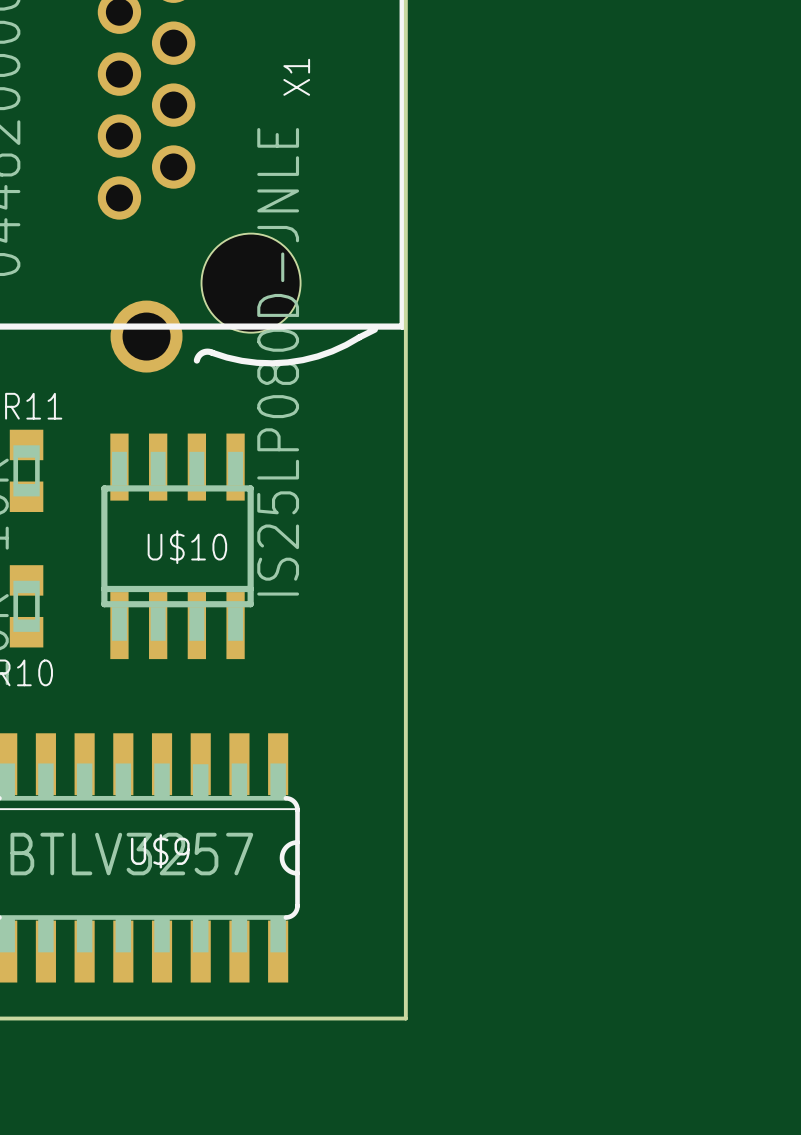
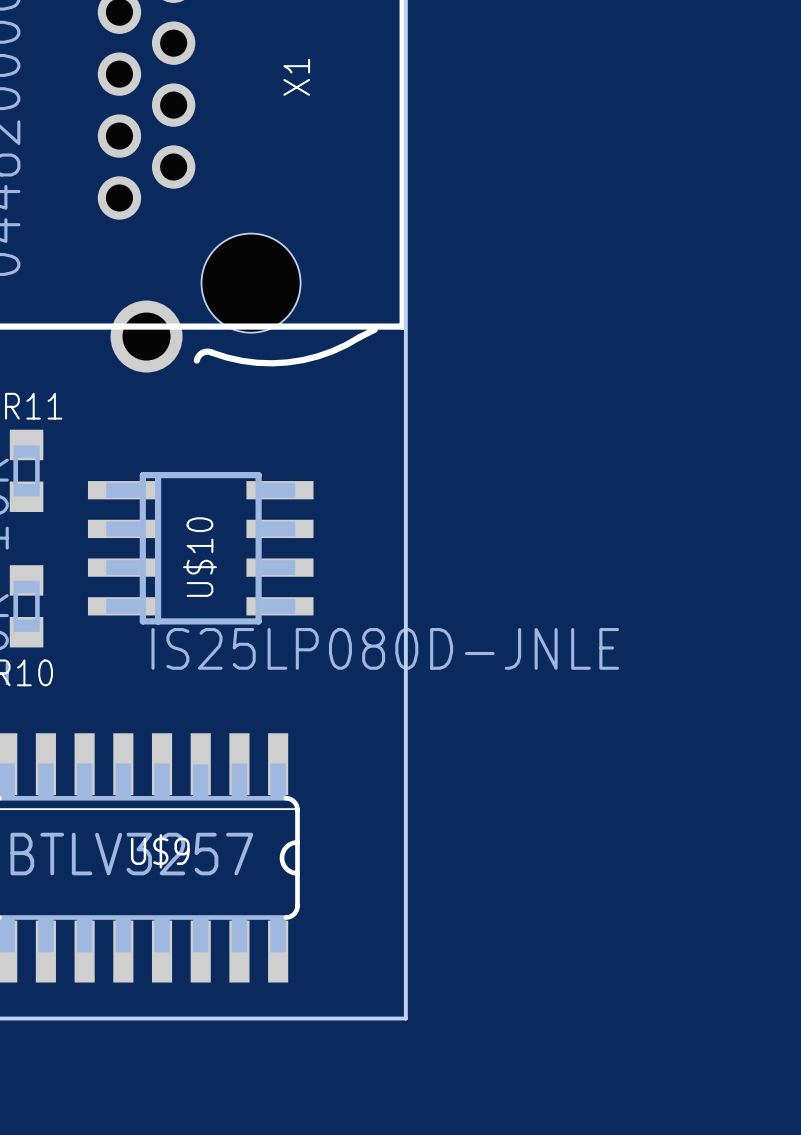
U$10 rotation: 0° (177, 546) -> 90° clockwise (200, 548)

